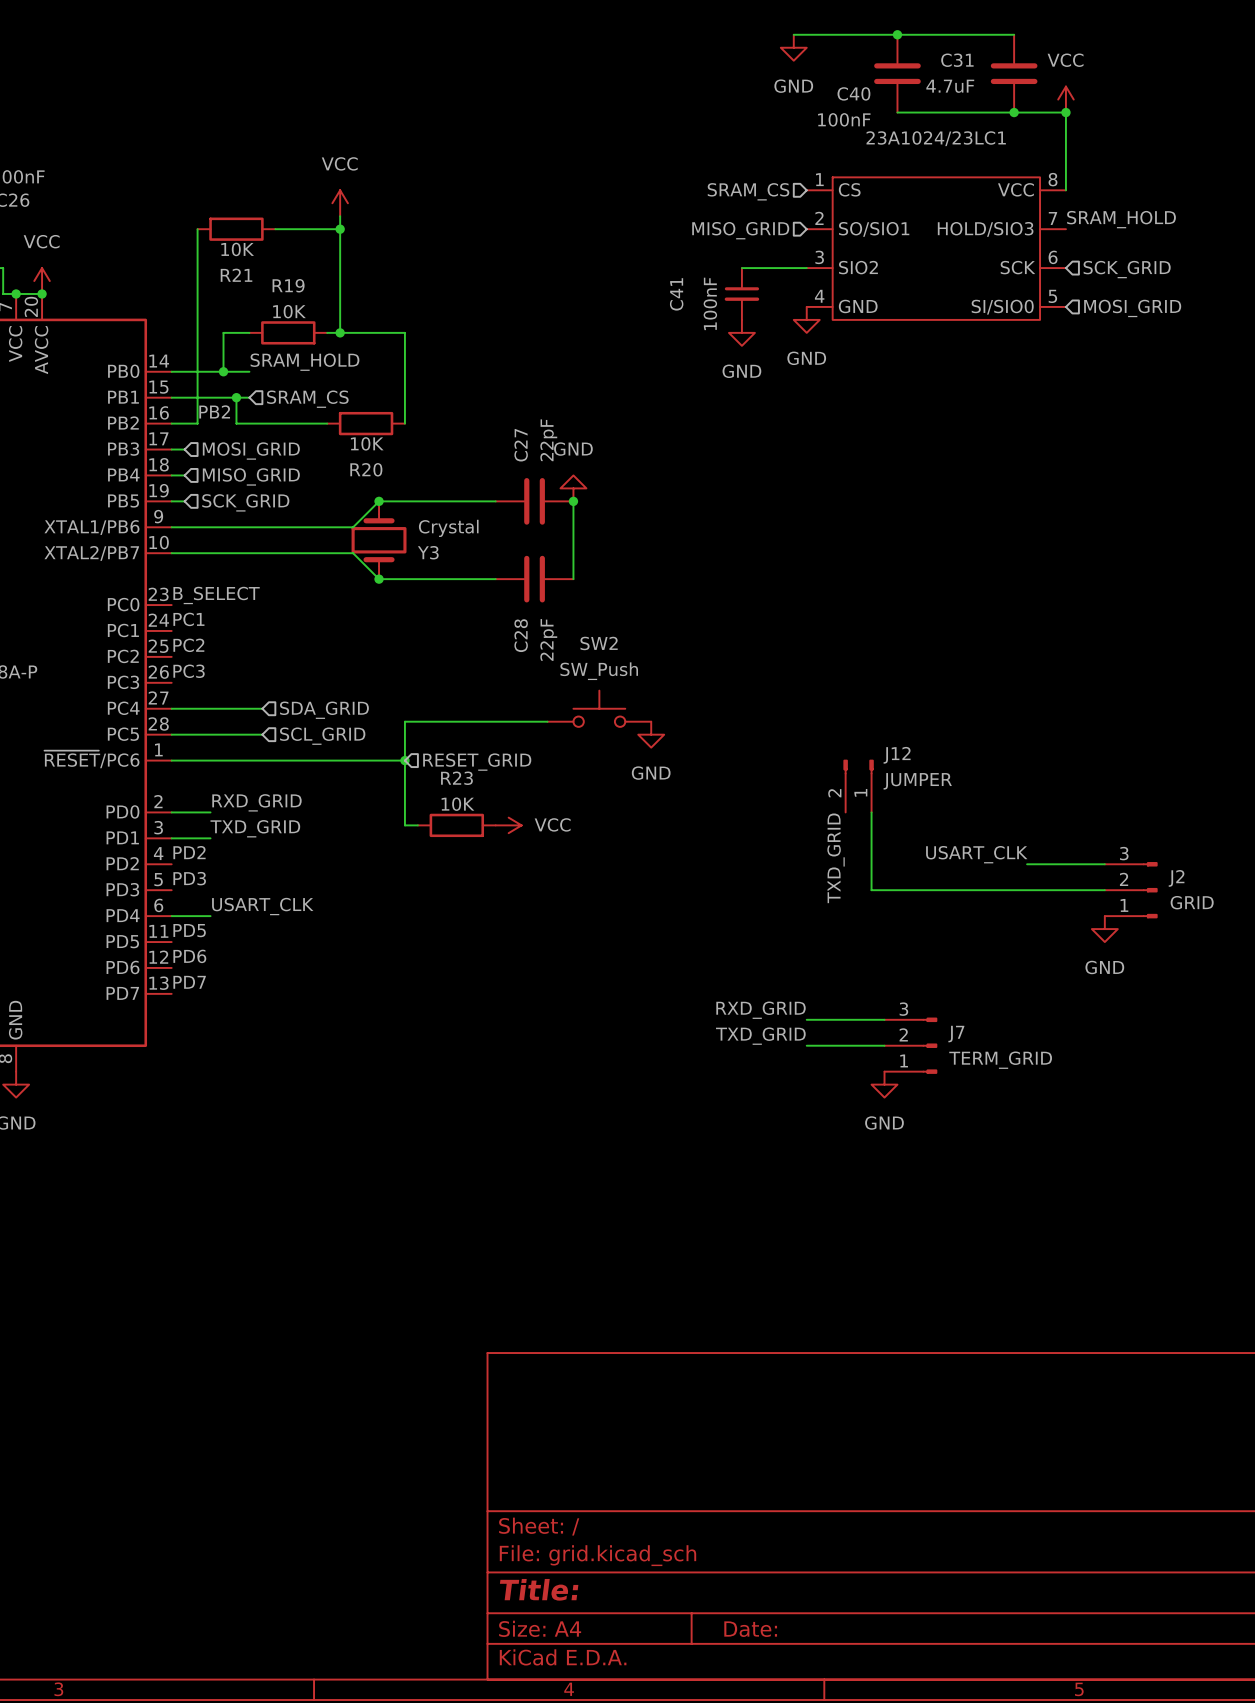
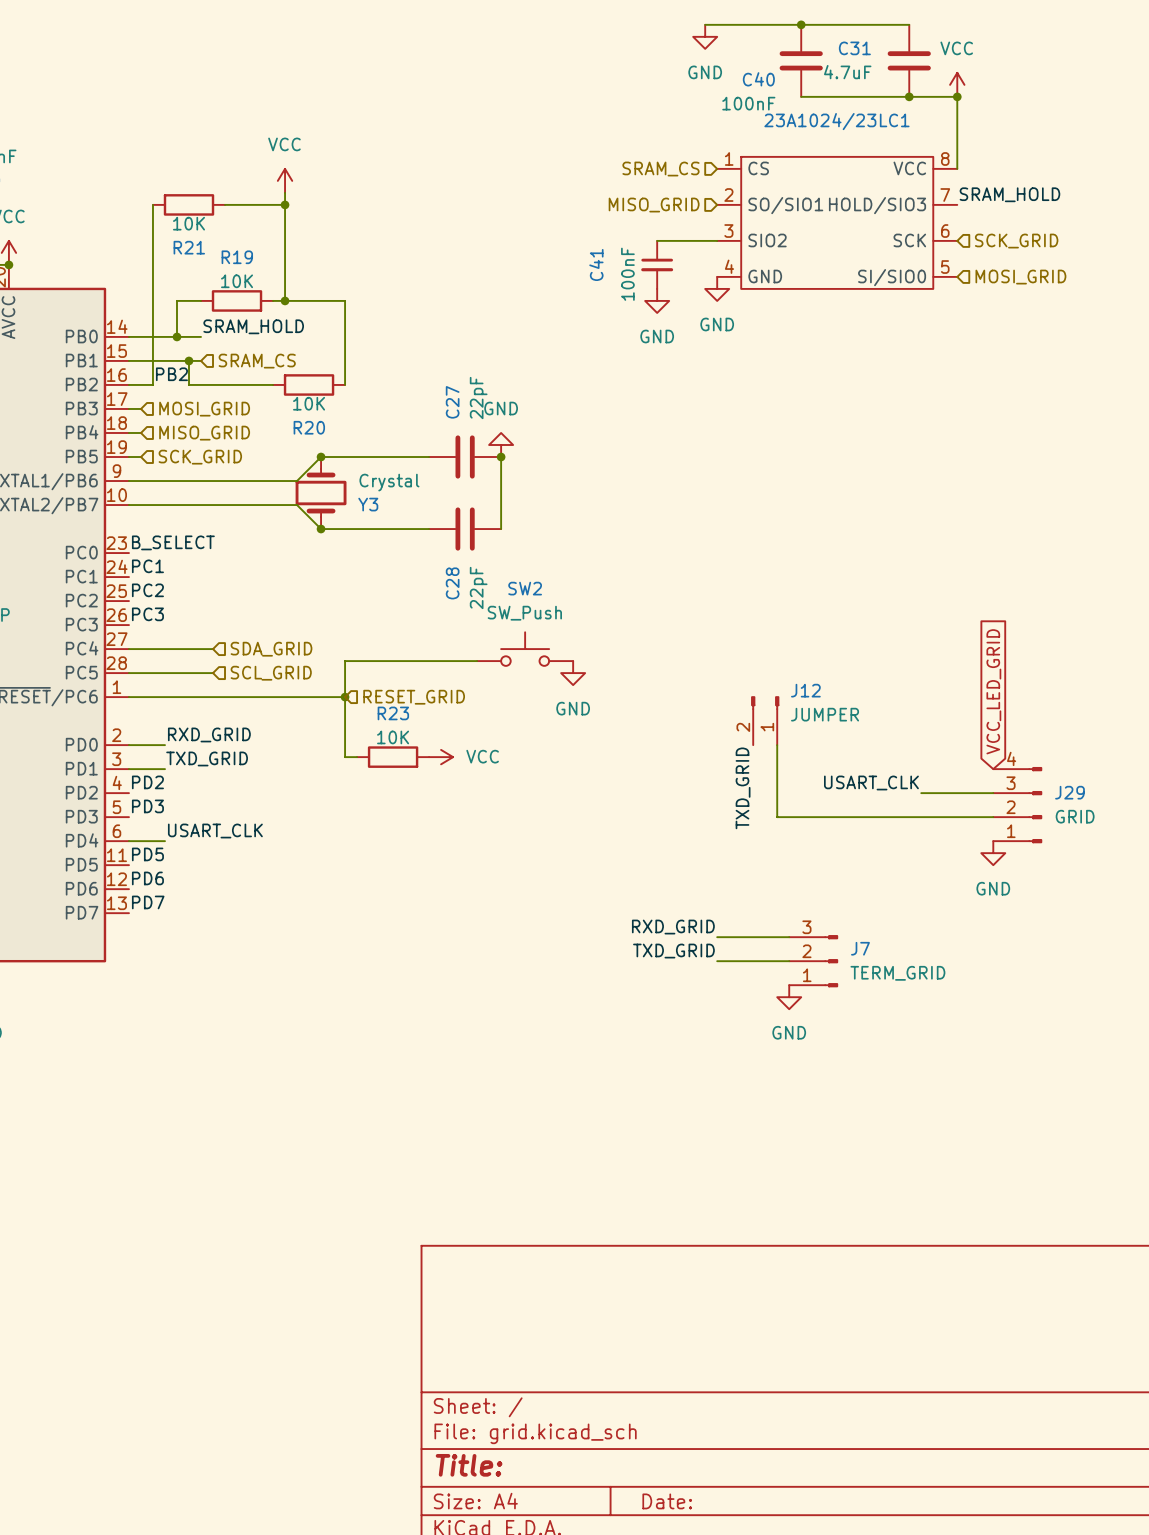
global label: none -> VCC_LED_GRID (993, 691)
J29: none -> GRID (1017, 805)
J2: GRID (1131, 890) -> none

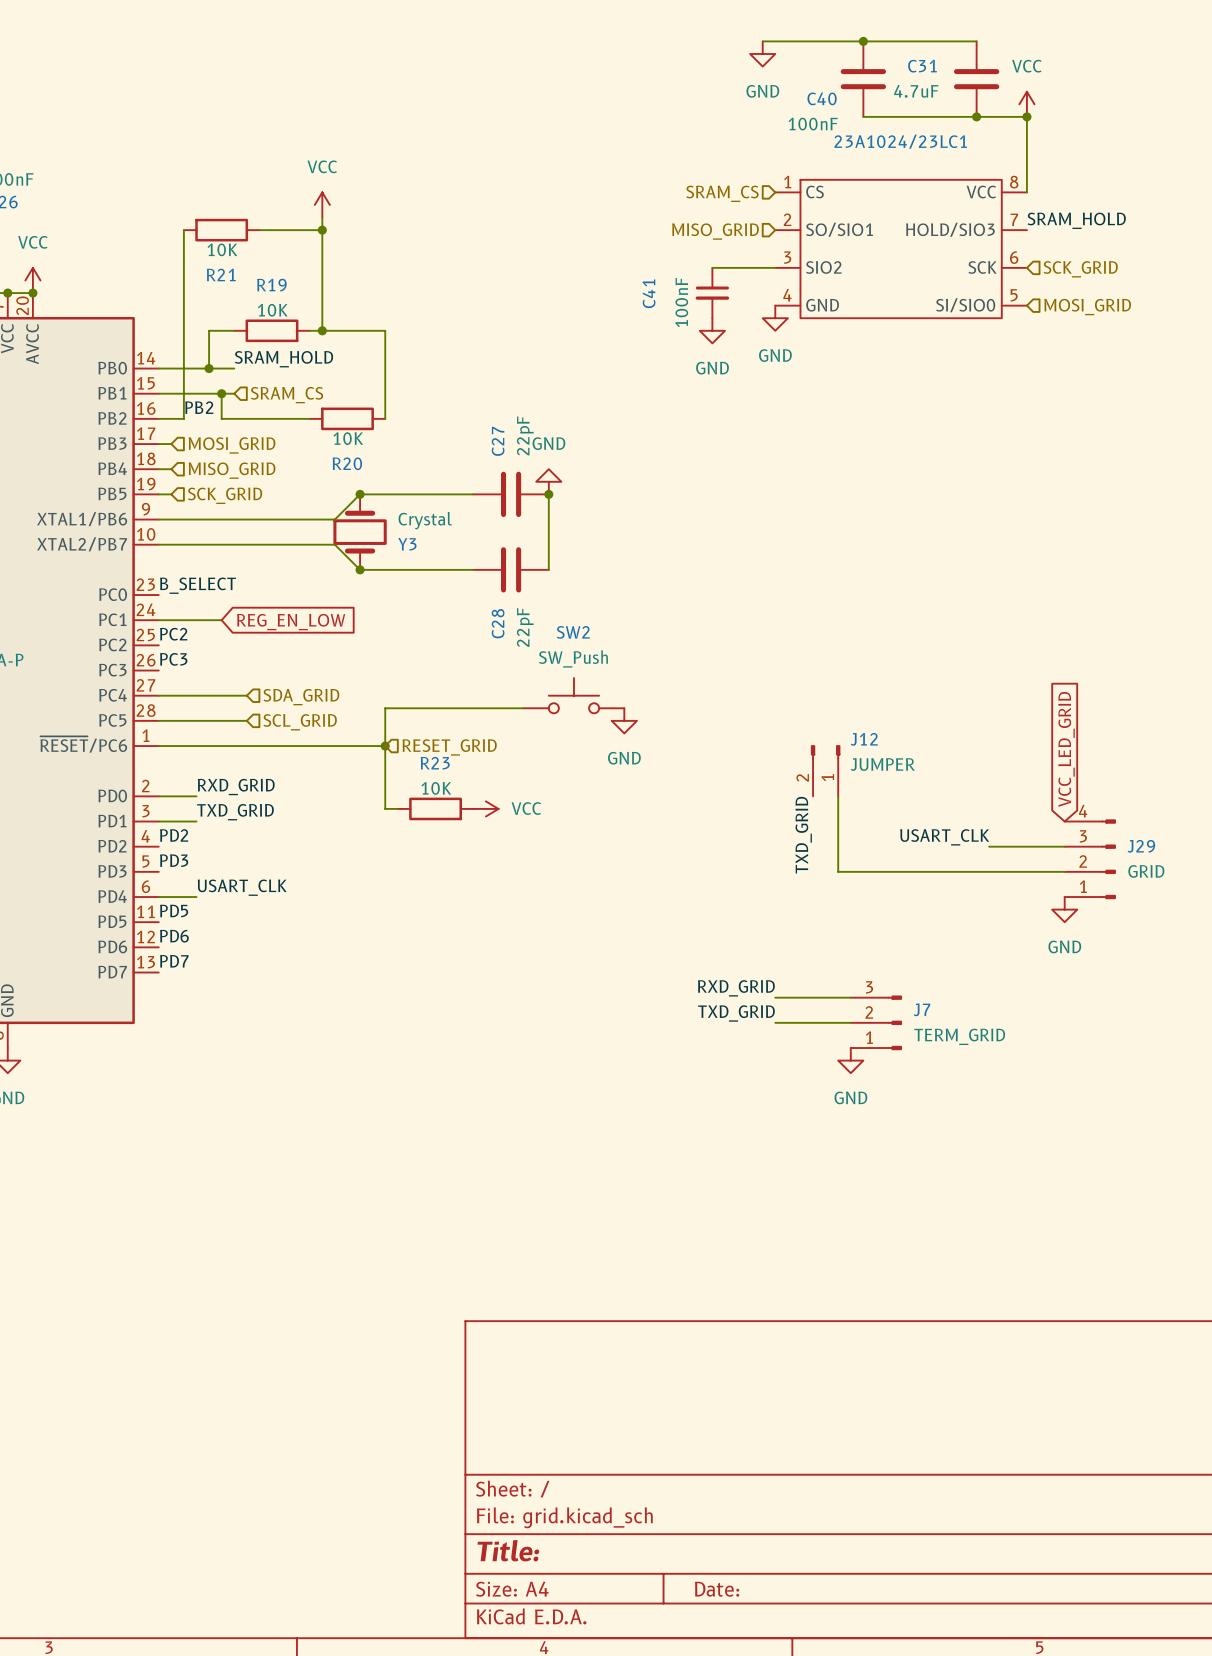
label: PC1 (147, 566) -> none
wire: none -> (158, 620) (221, 620)
global label: none -> REG_EN_LOW (291, 622)

